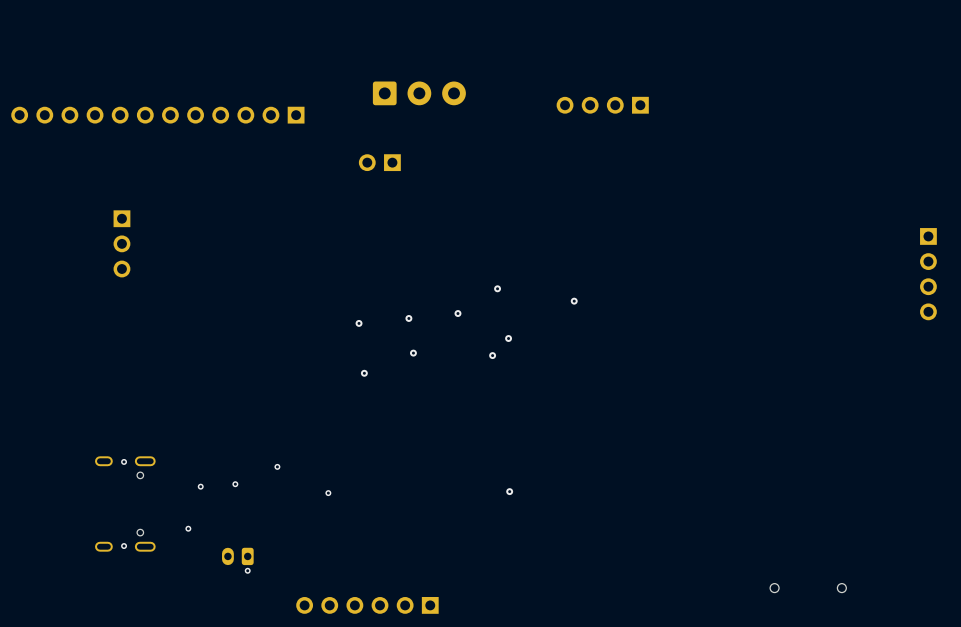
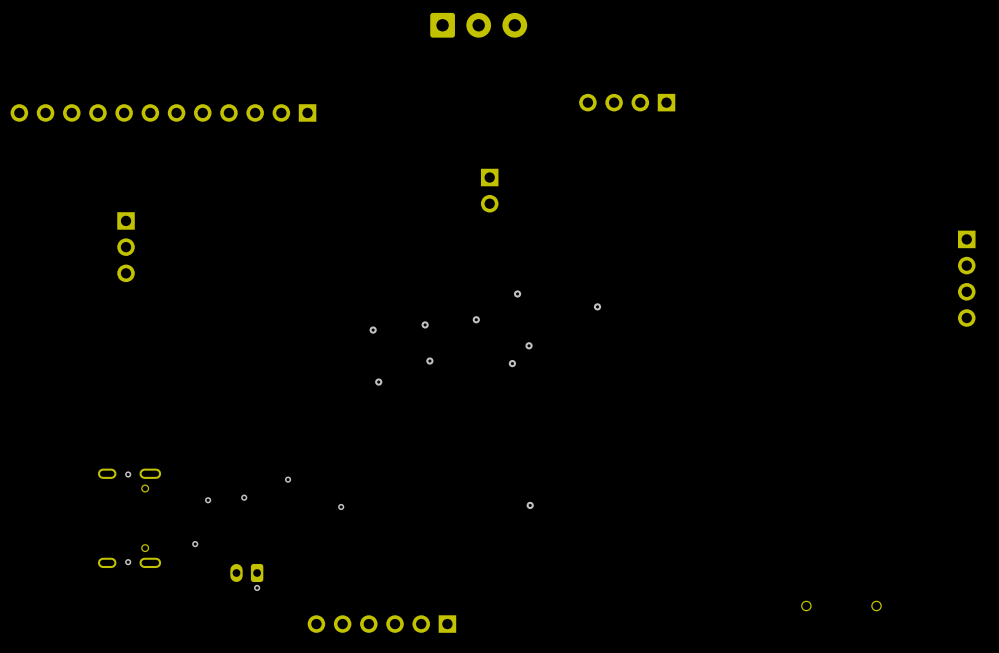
part position: (419, 93) -> (478, 25)
part rotation: 0° (379, 162) -> 90° counterclockwise (489, 190)
part position: (379, 162) -> (489, 190)

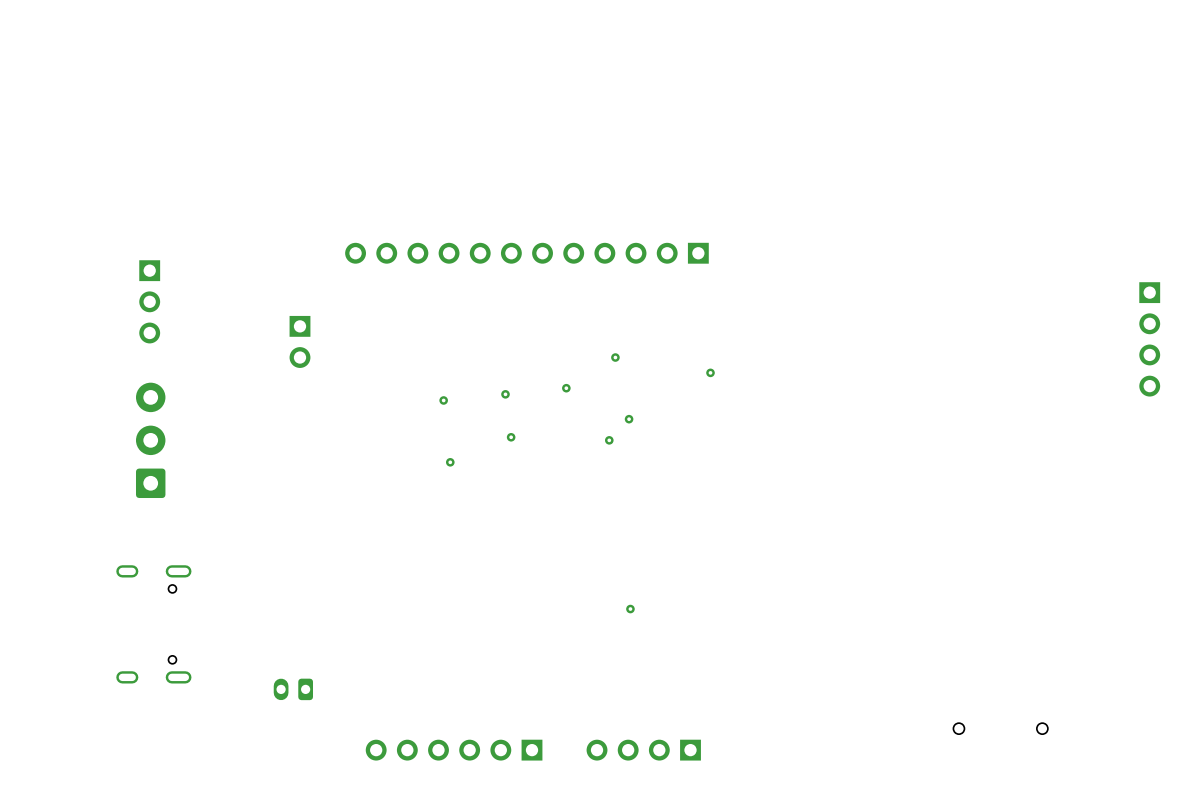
part: (478, 25) -> none
part: (627, 102) -> none
part: (163, 112) -> none
part position: (489, 190) -> (299, 341)
part: none -> (526, 253)
part: none -> (150, 440)
via: (128, 474) -> none
via: (288, 479) -> none
via: (244, 497) -> none
via: (208, 500) -> none
via: (341, 506) -> none
via: (195, 544) -> none
via: (128, 562) -> none
via: (257, 587) -> none
part: none -> (643, 750)

